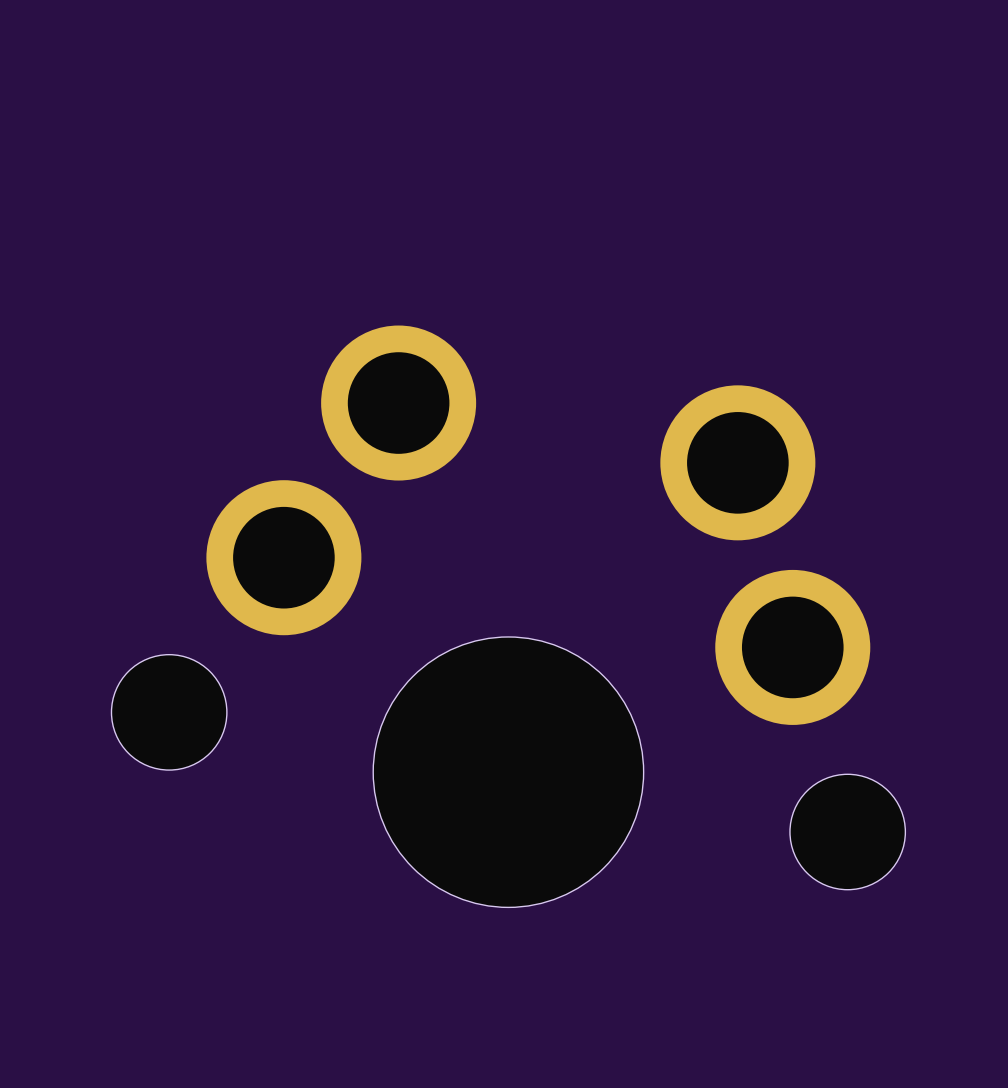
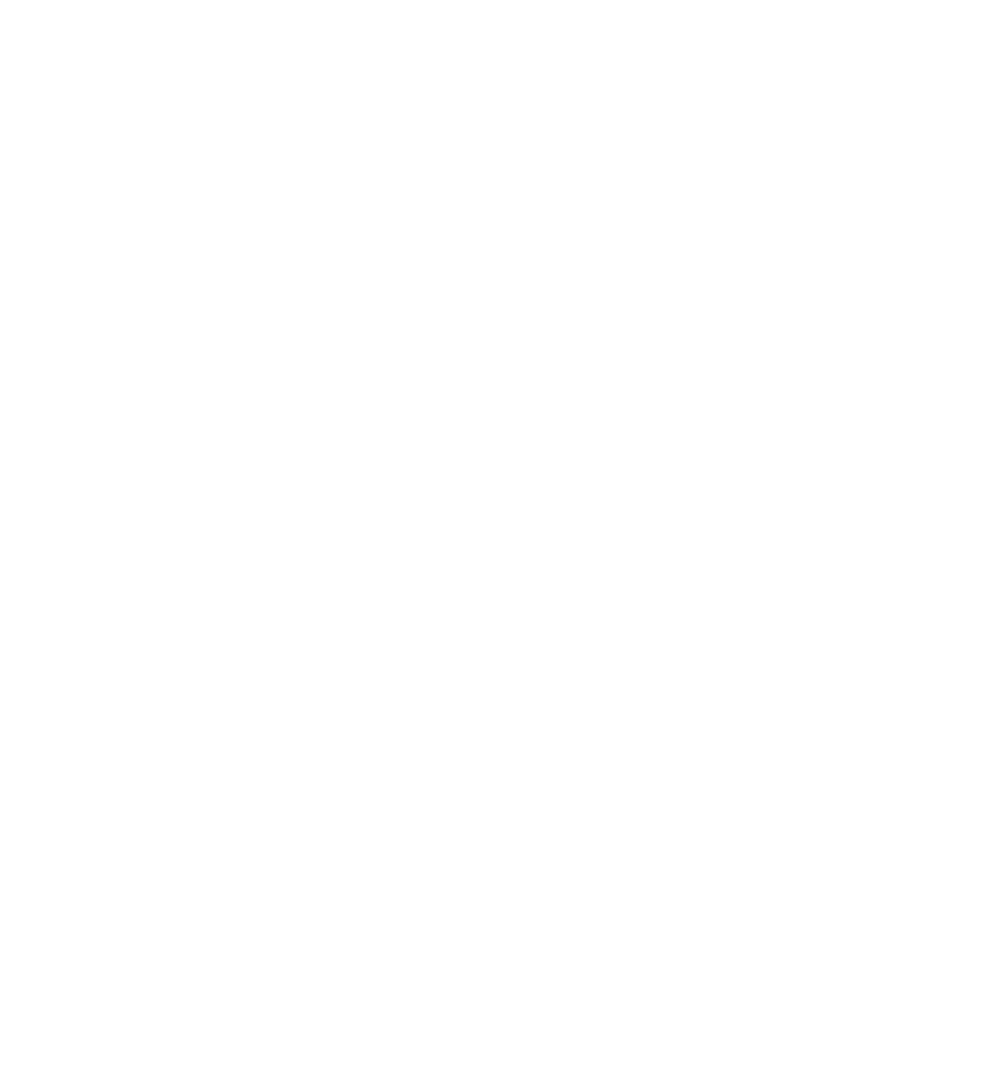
part: (508, 616) -> none

